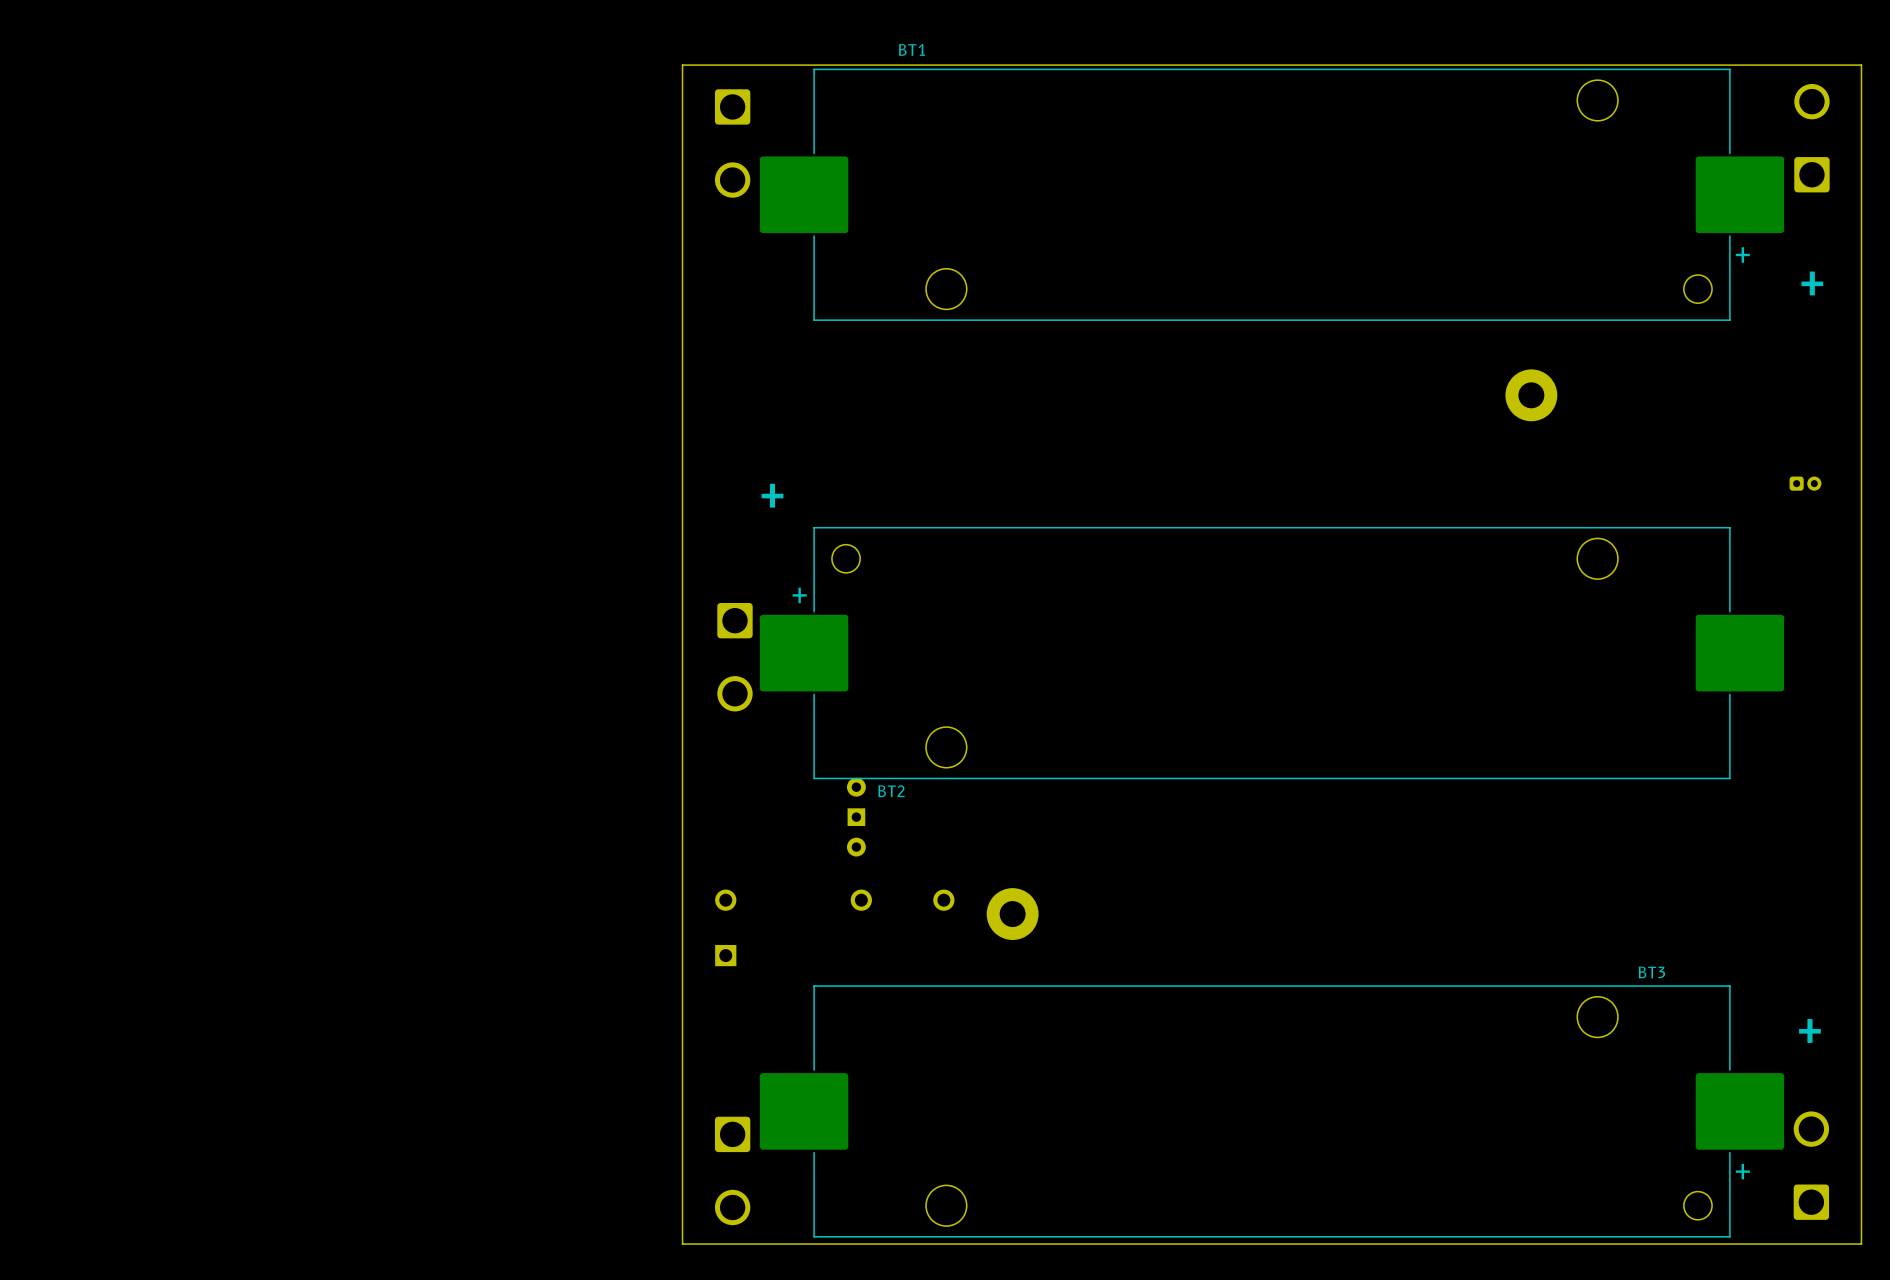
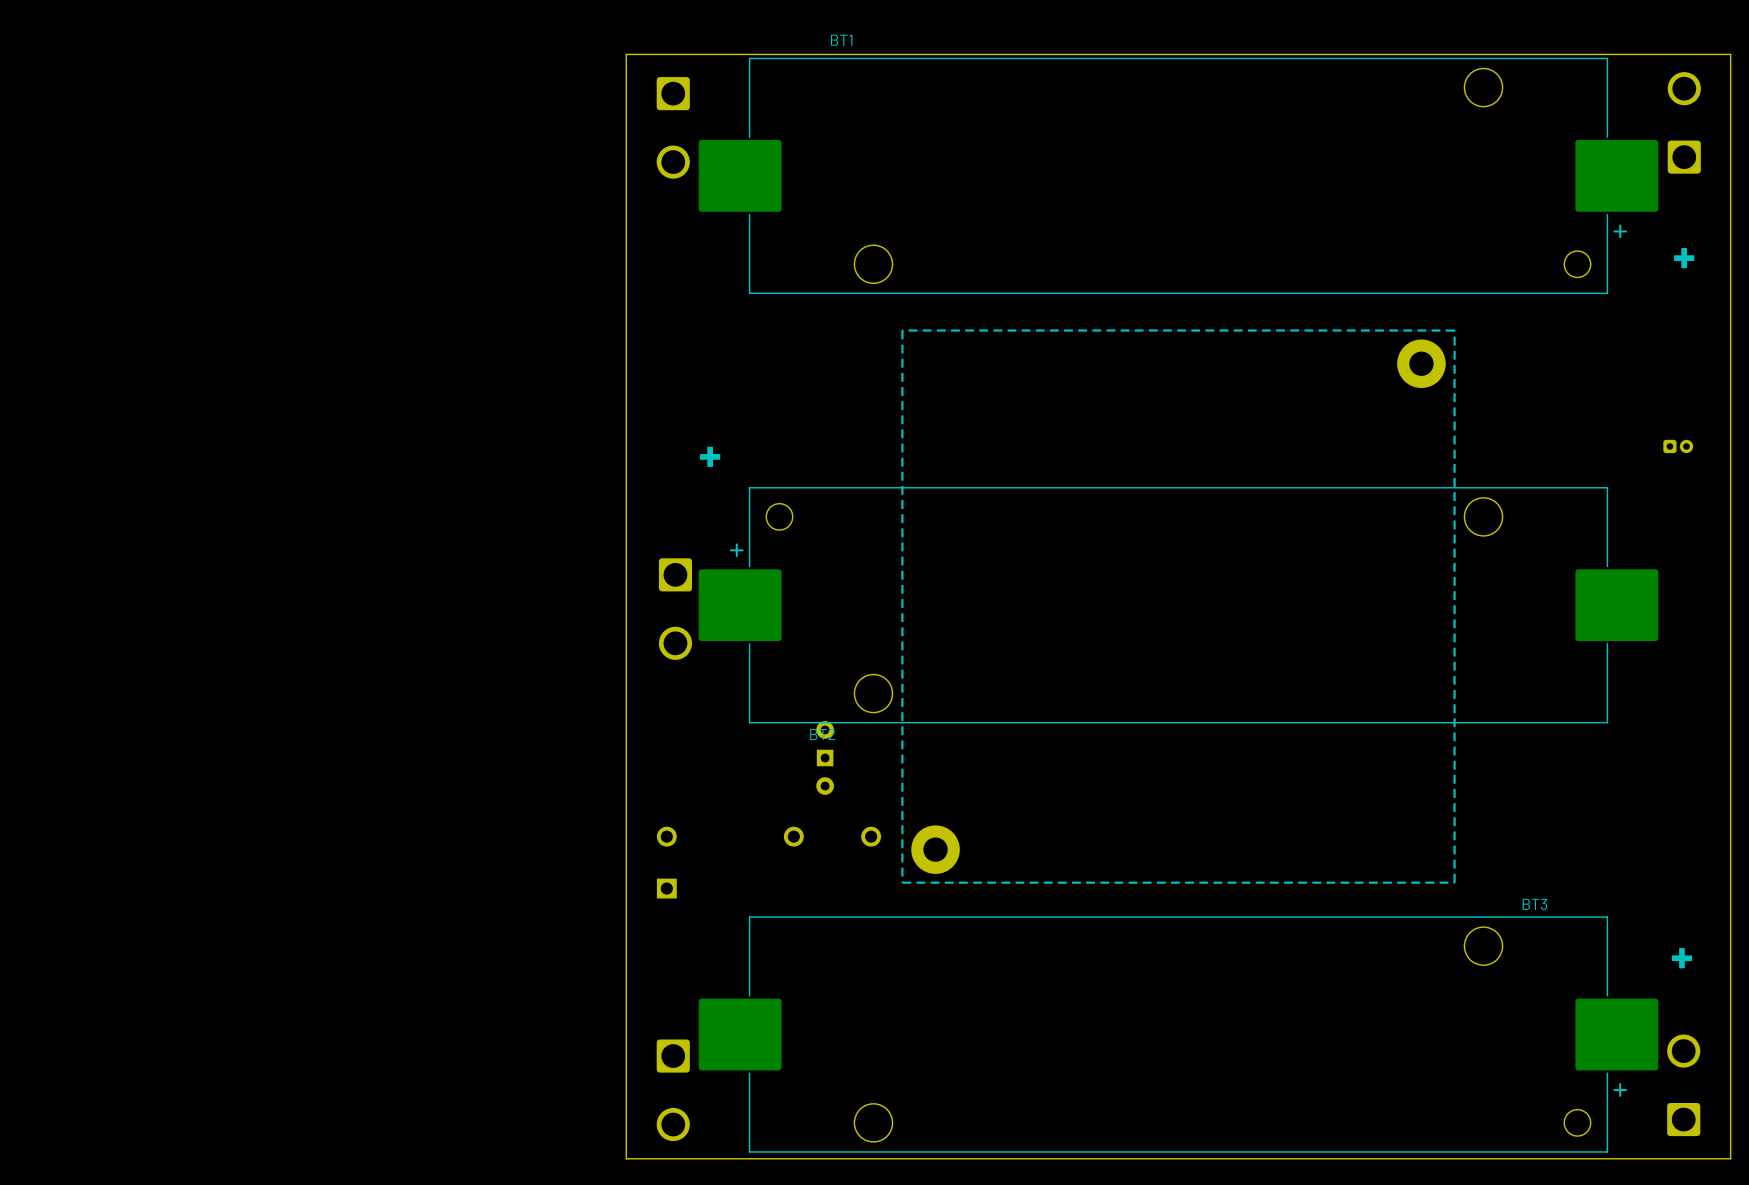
line: none -> (1454, 330) (902, 330) (902, 882) (1454, 882) (1454, 330)
part position: (856, 817) -> (825, 757)

